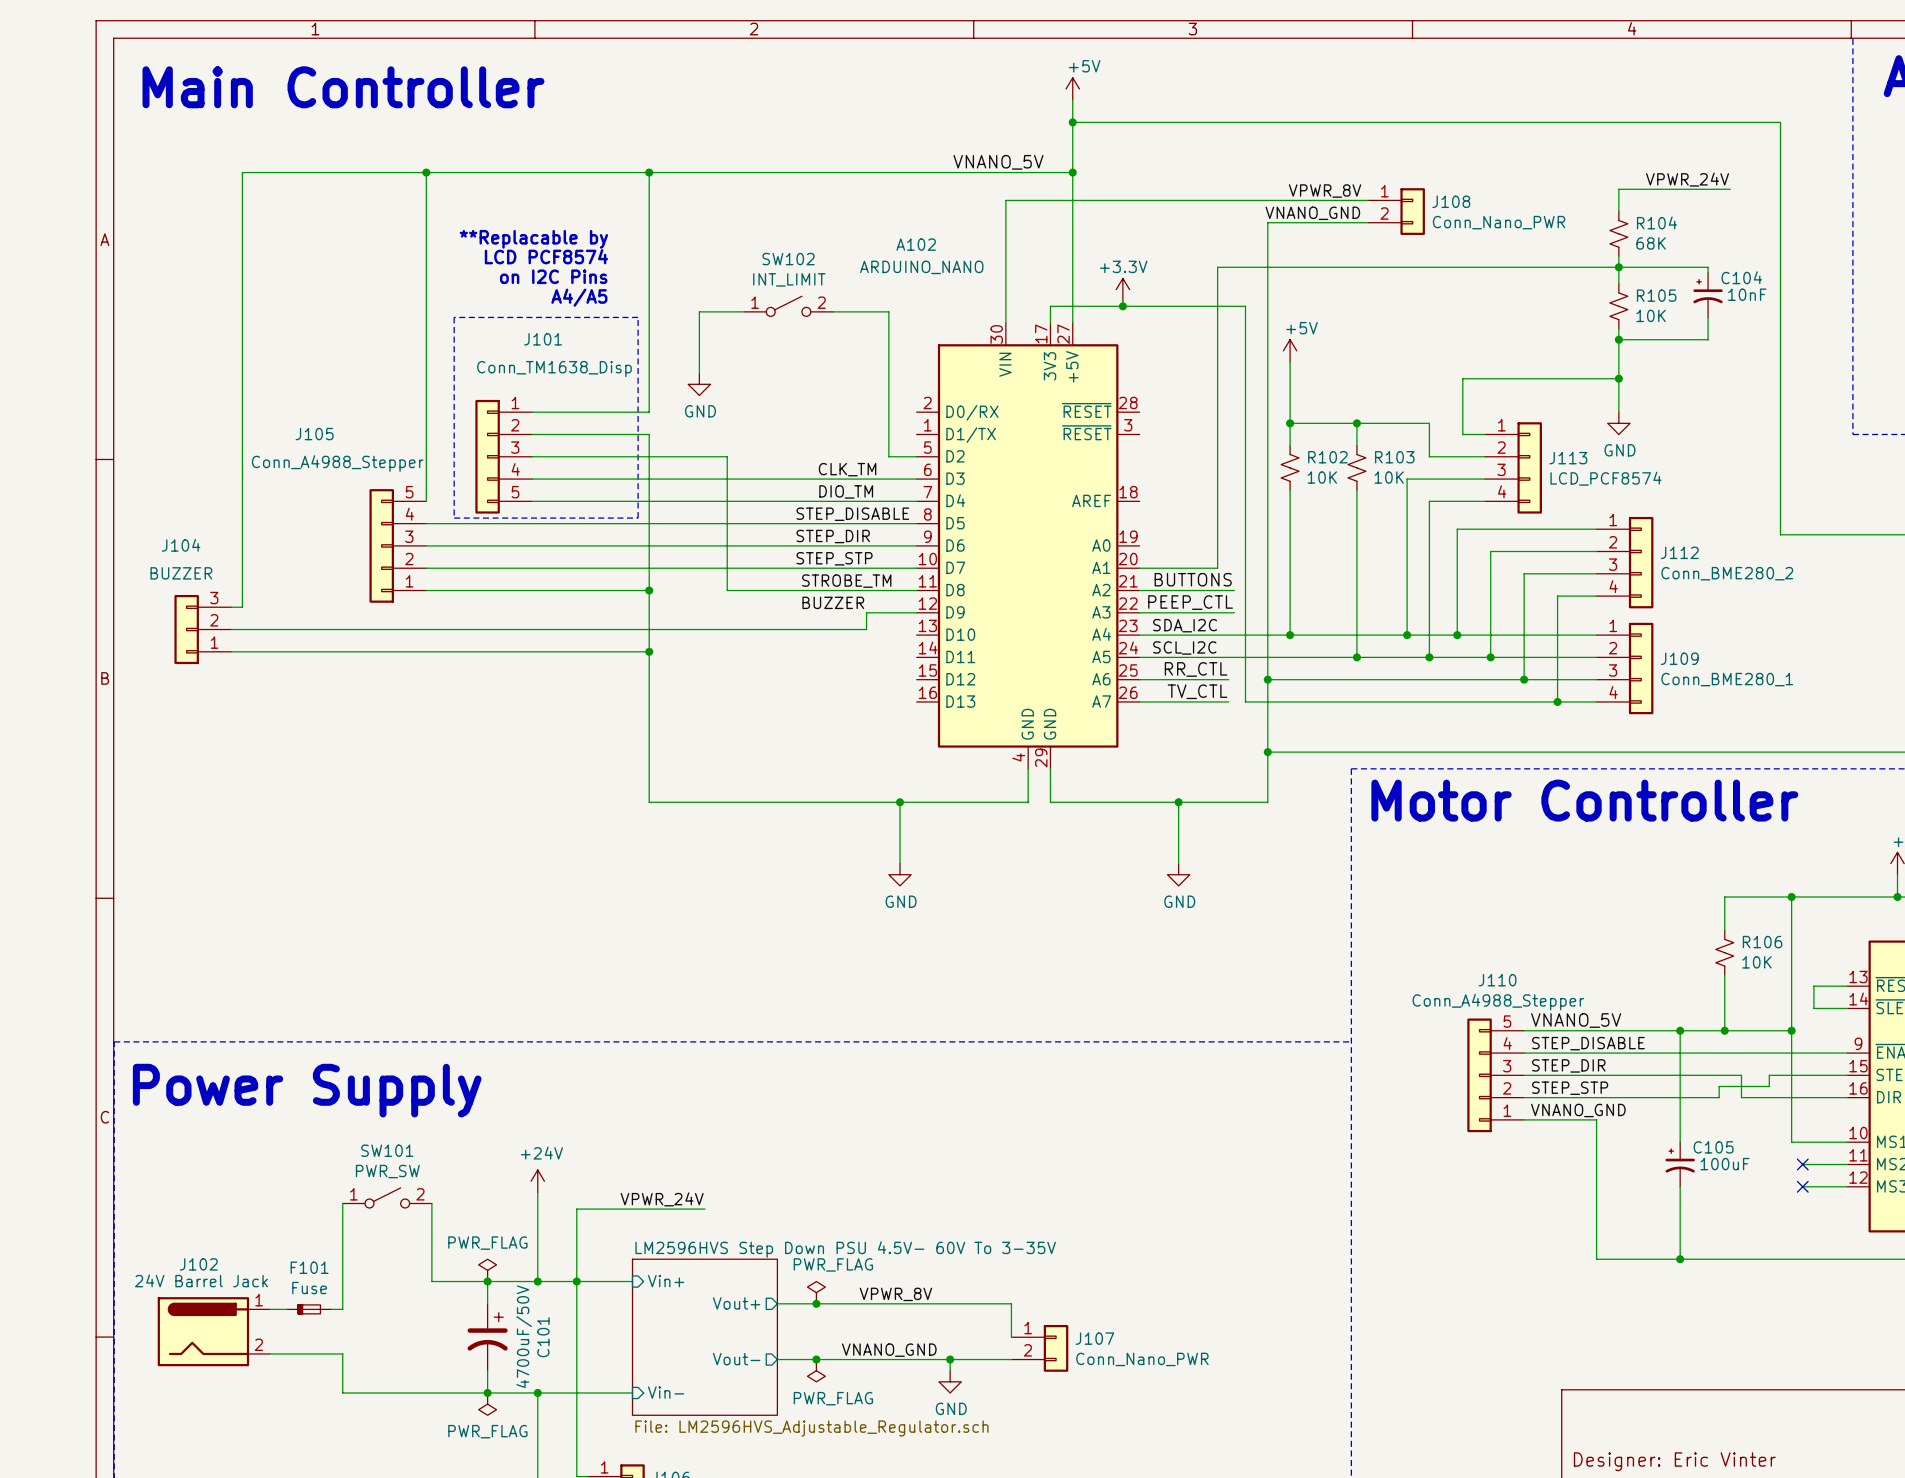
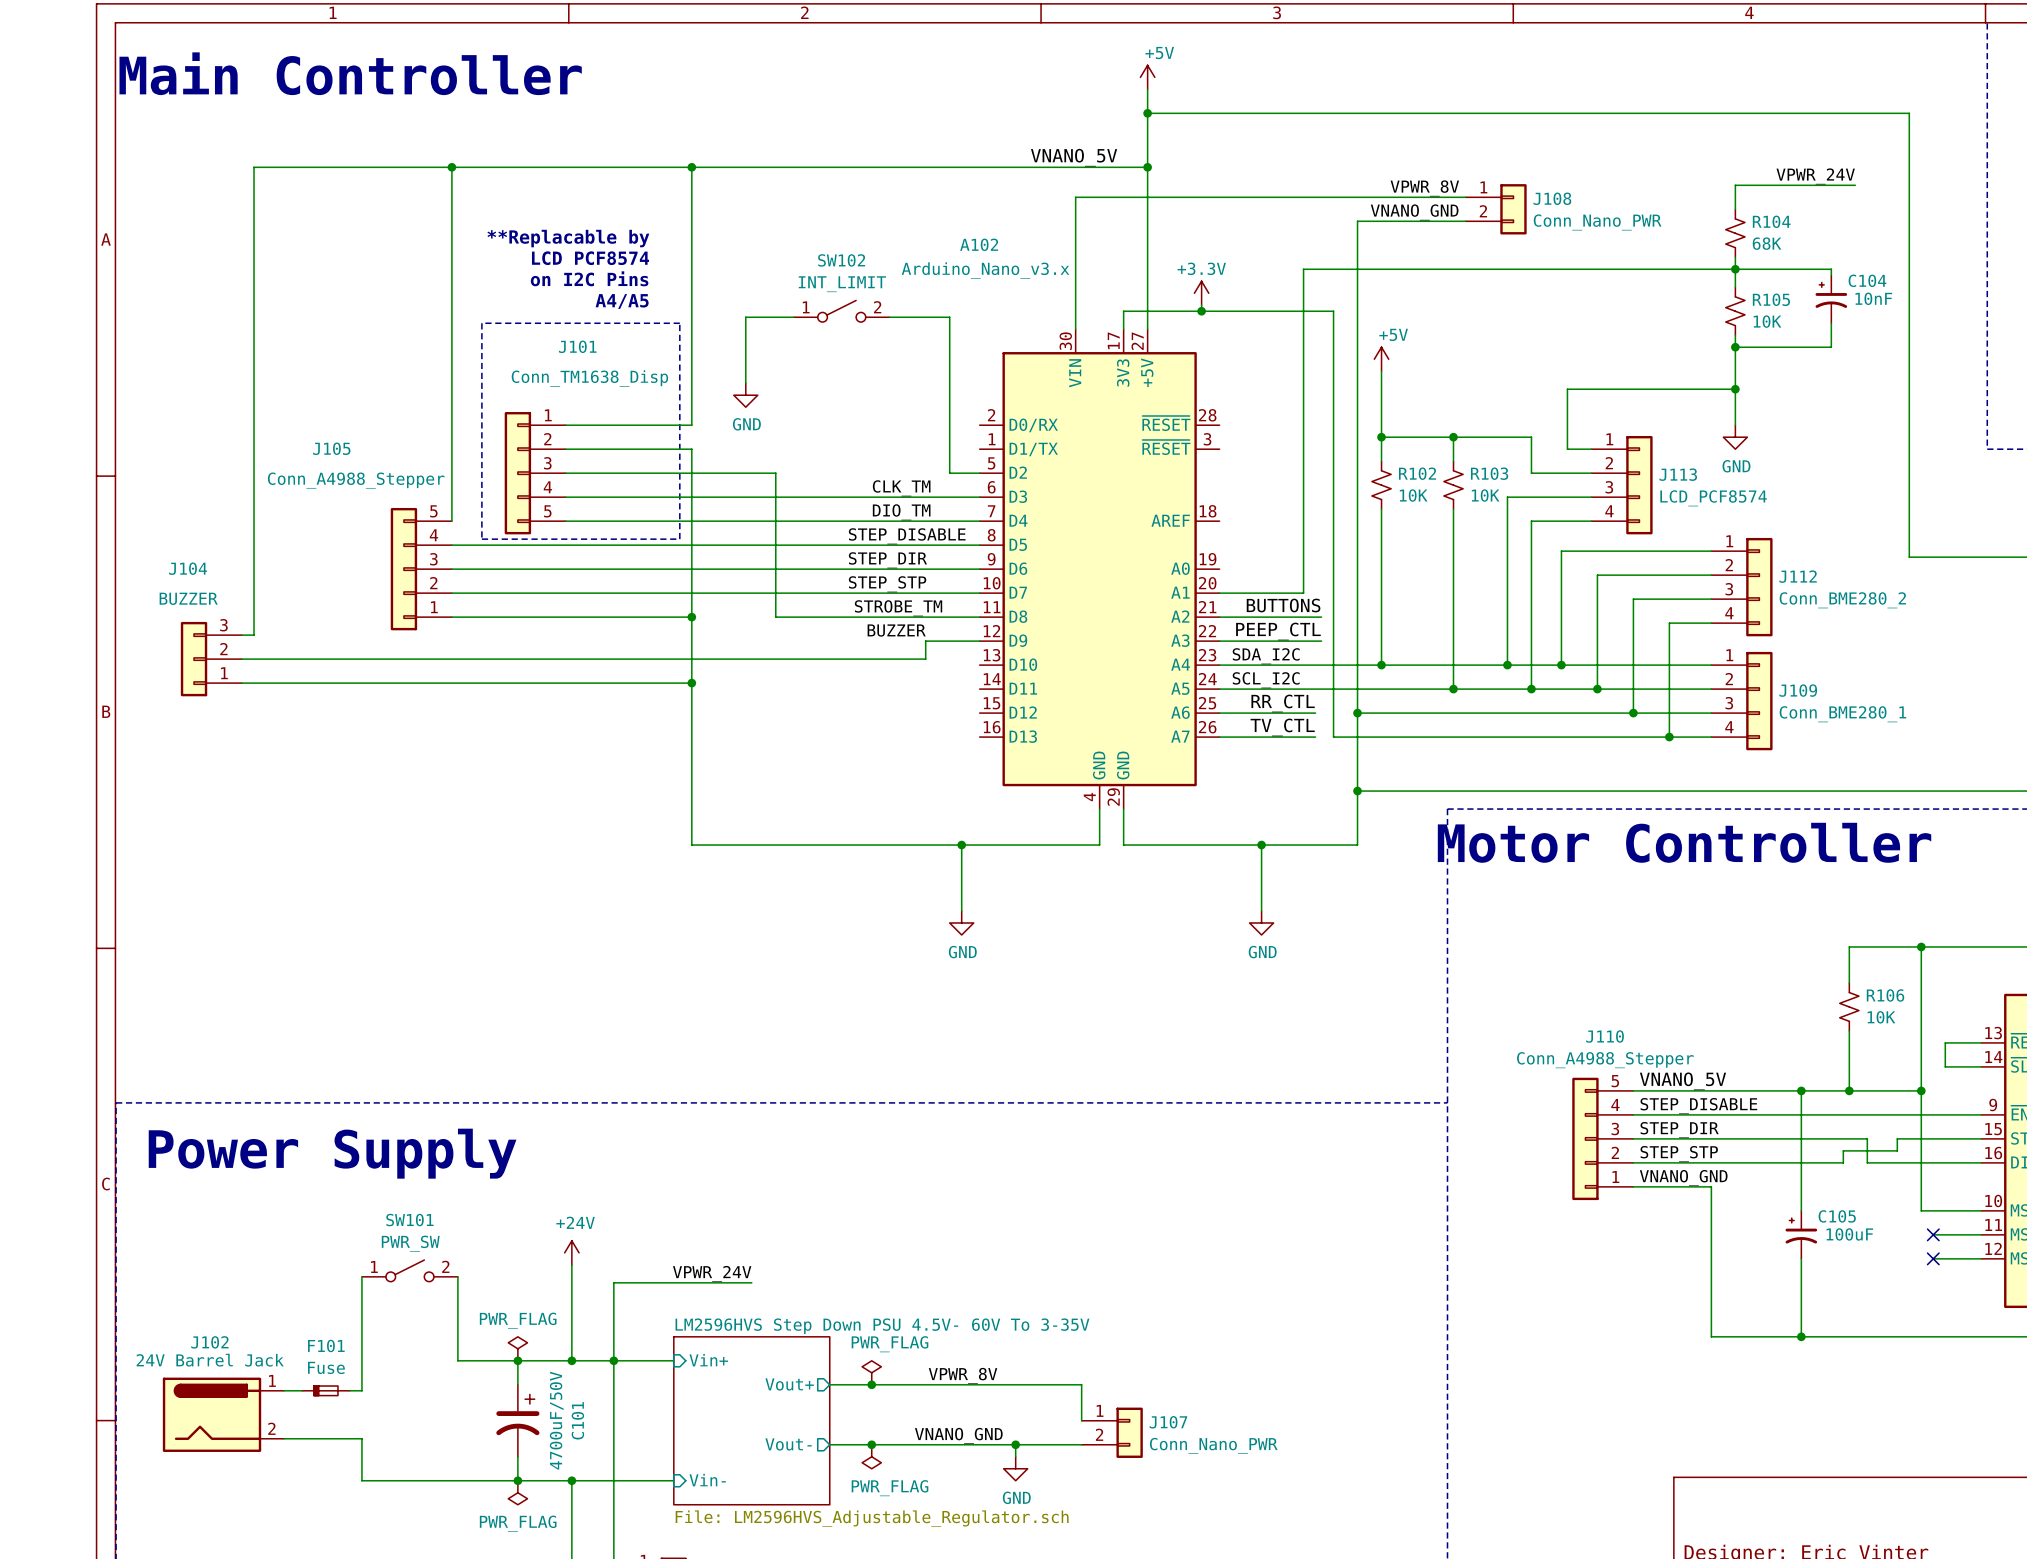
A102 value: ARDUINO_NANO (921, 267) -> Arduino_Nano_v3.x (985, 270)

